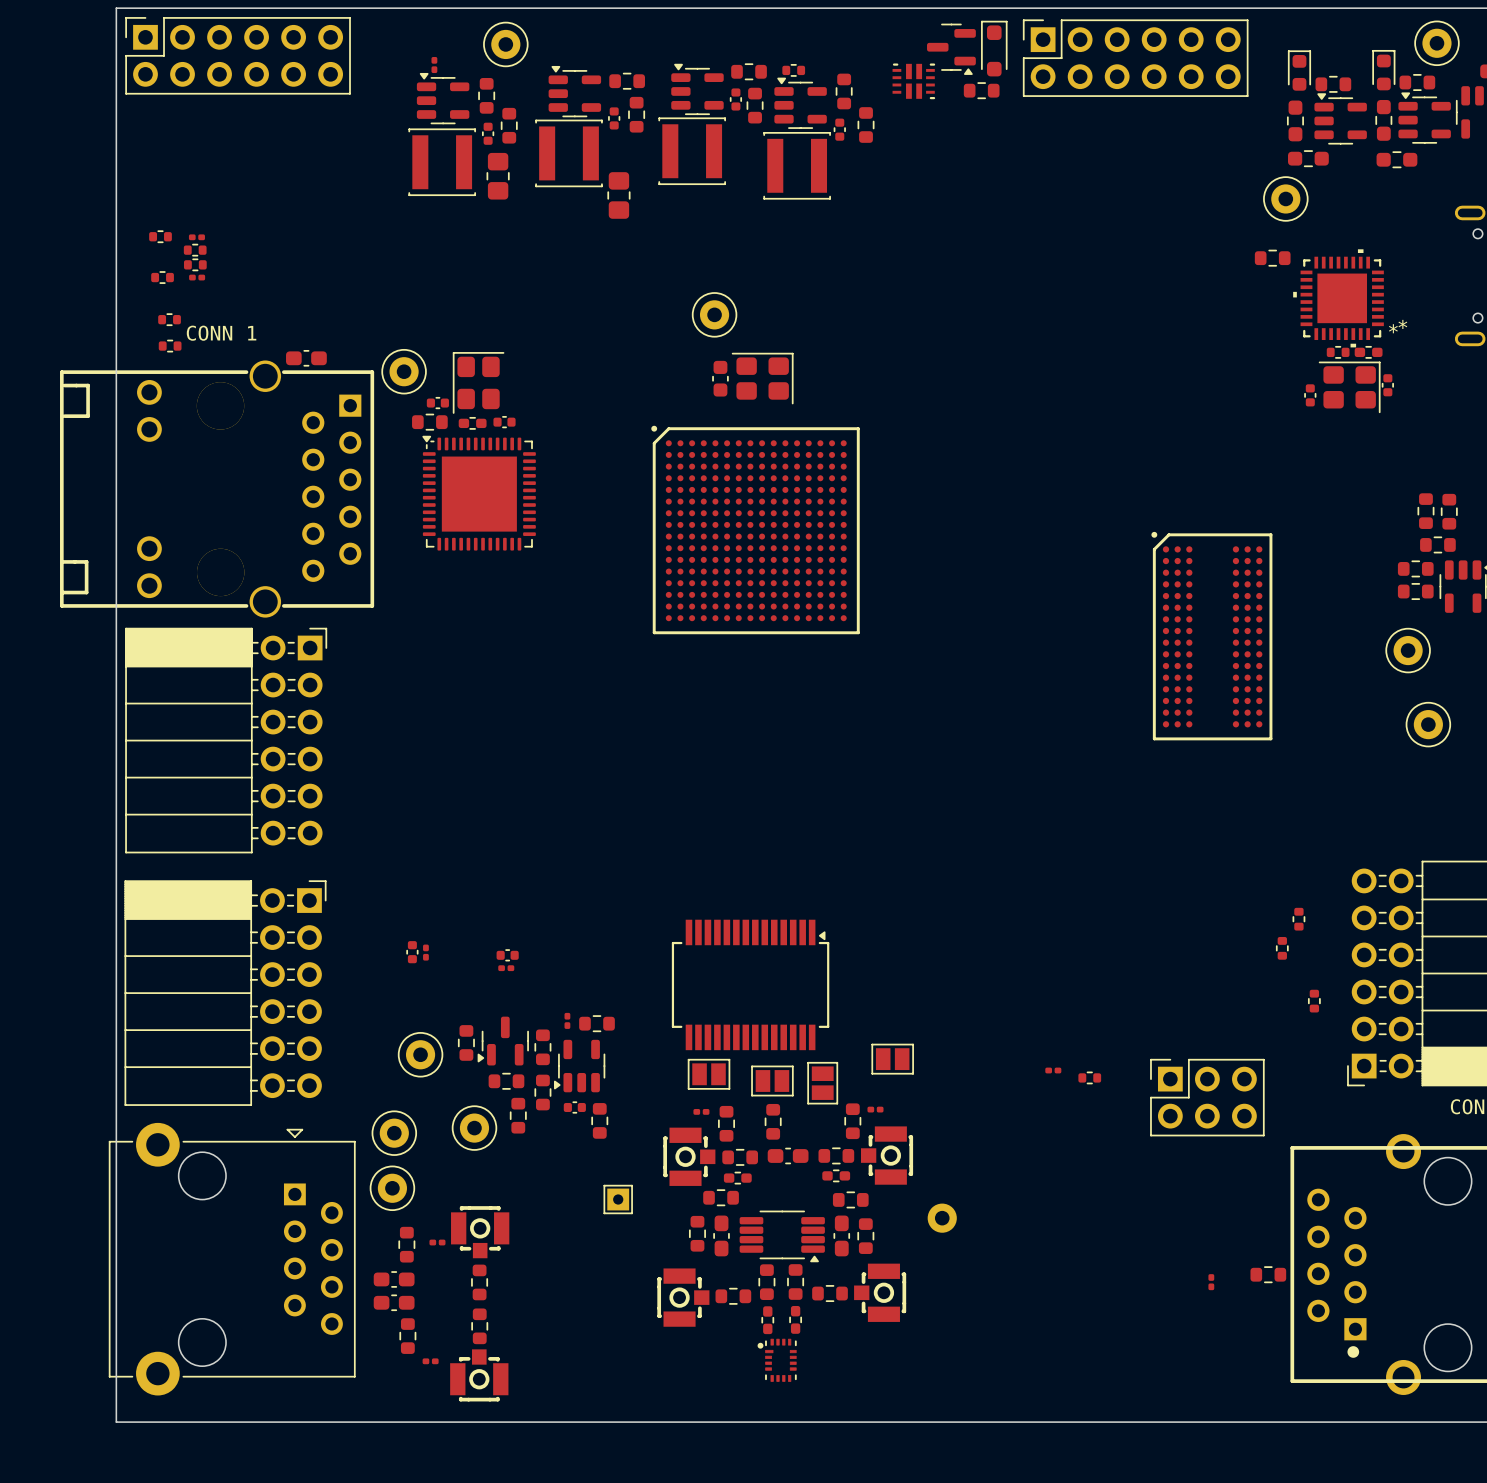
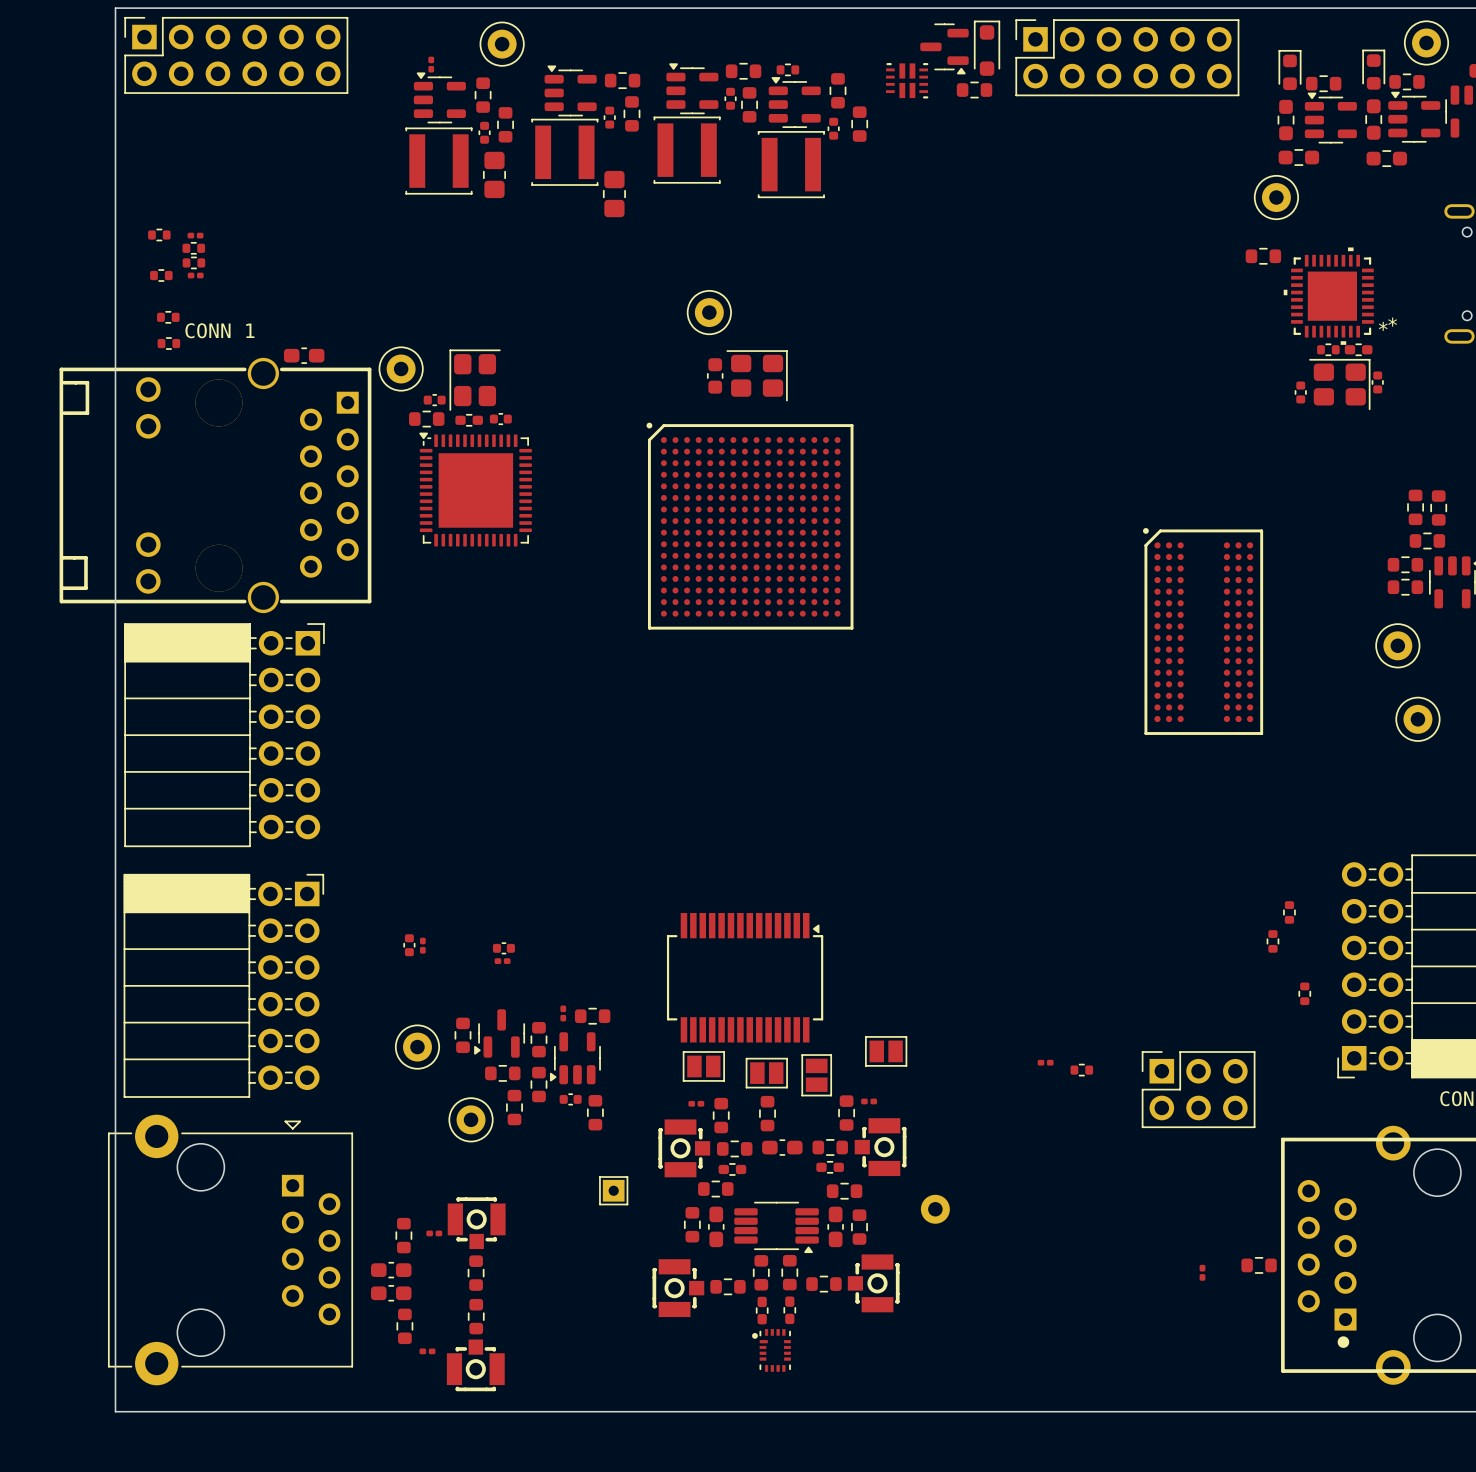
part: (394, 1133) -> none
part: (392, 1188) -> none

